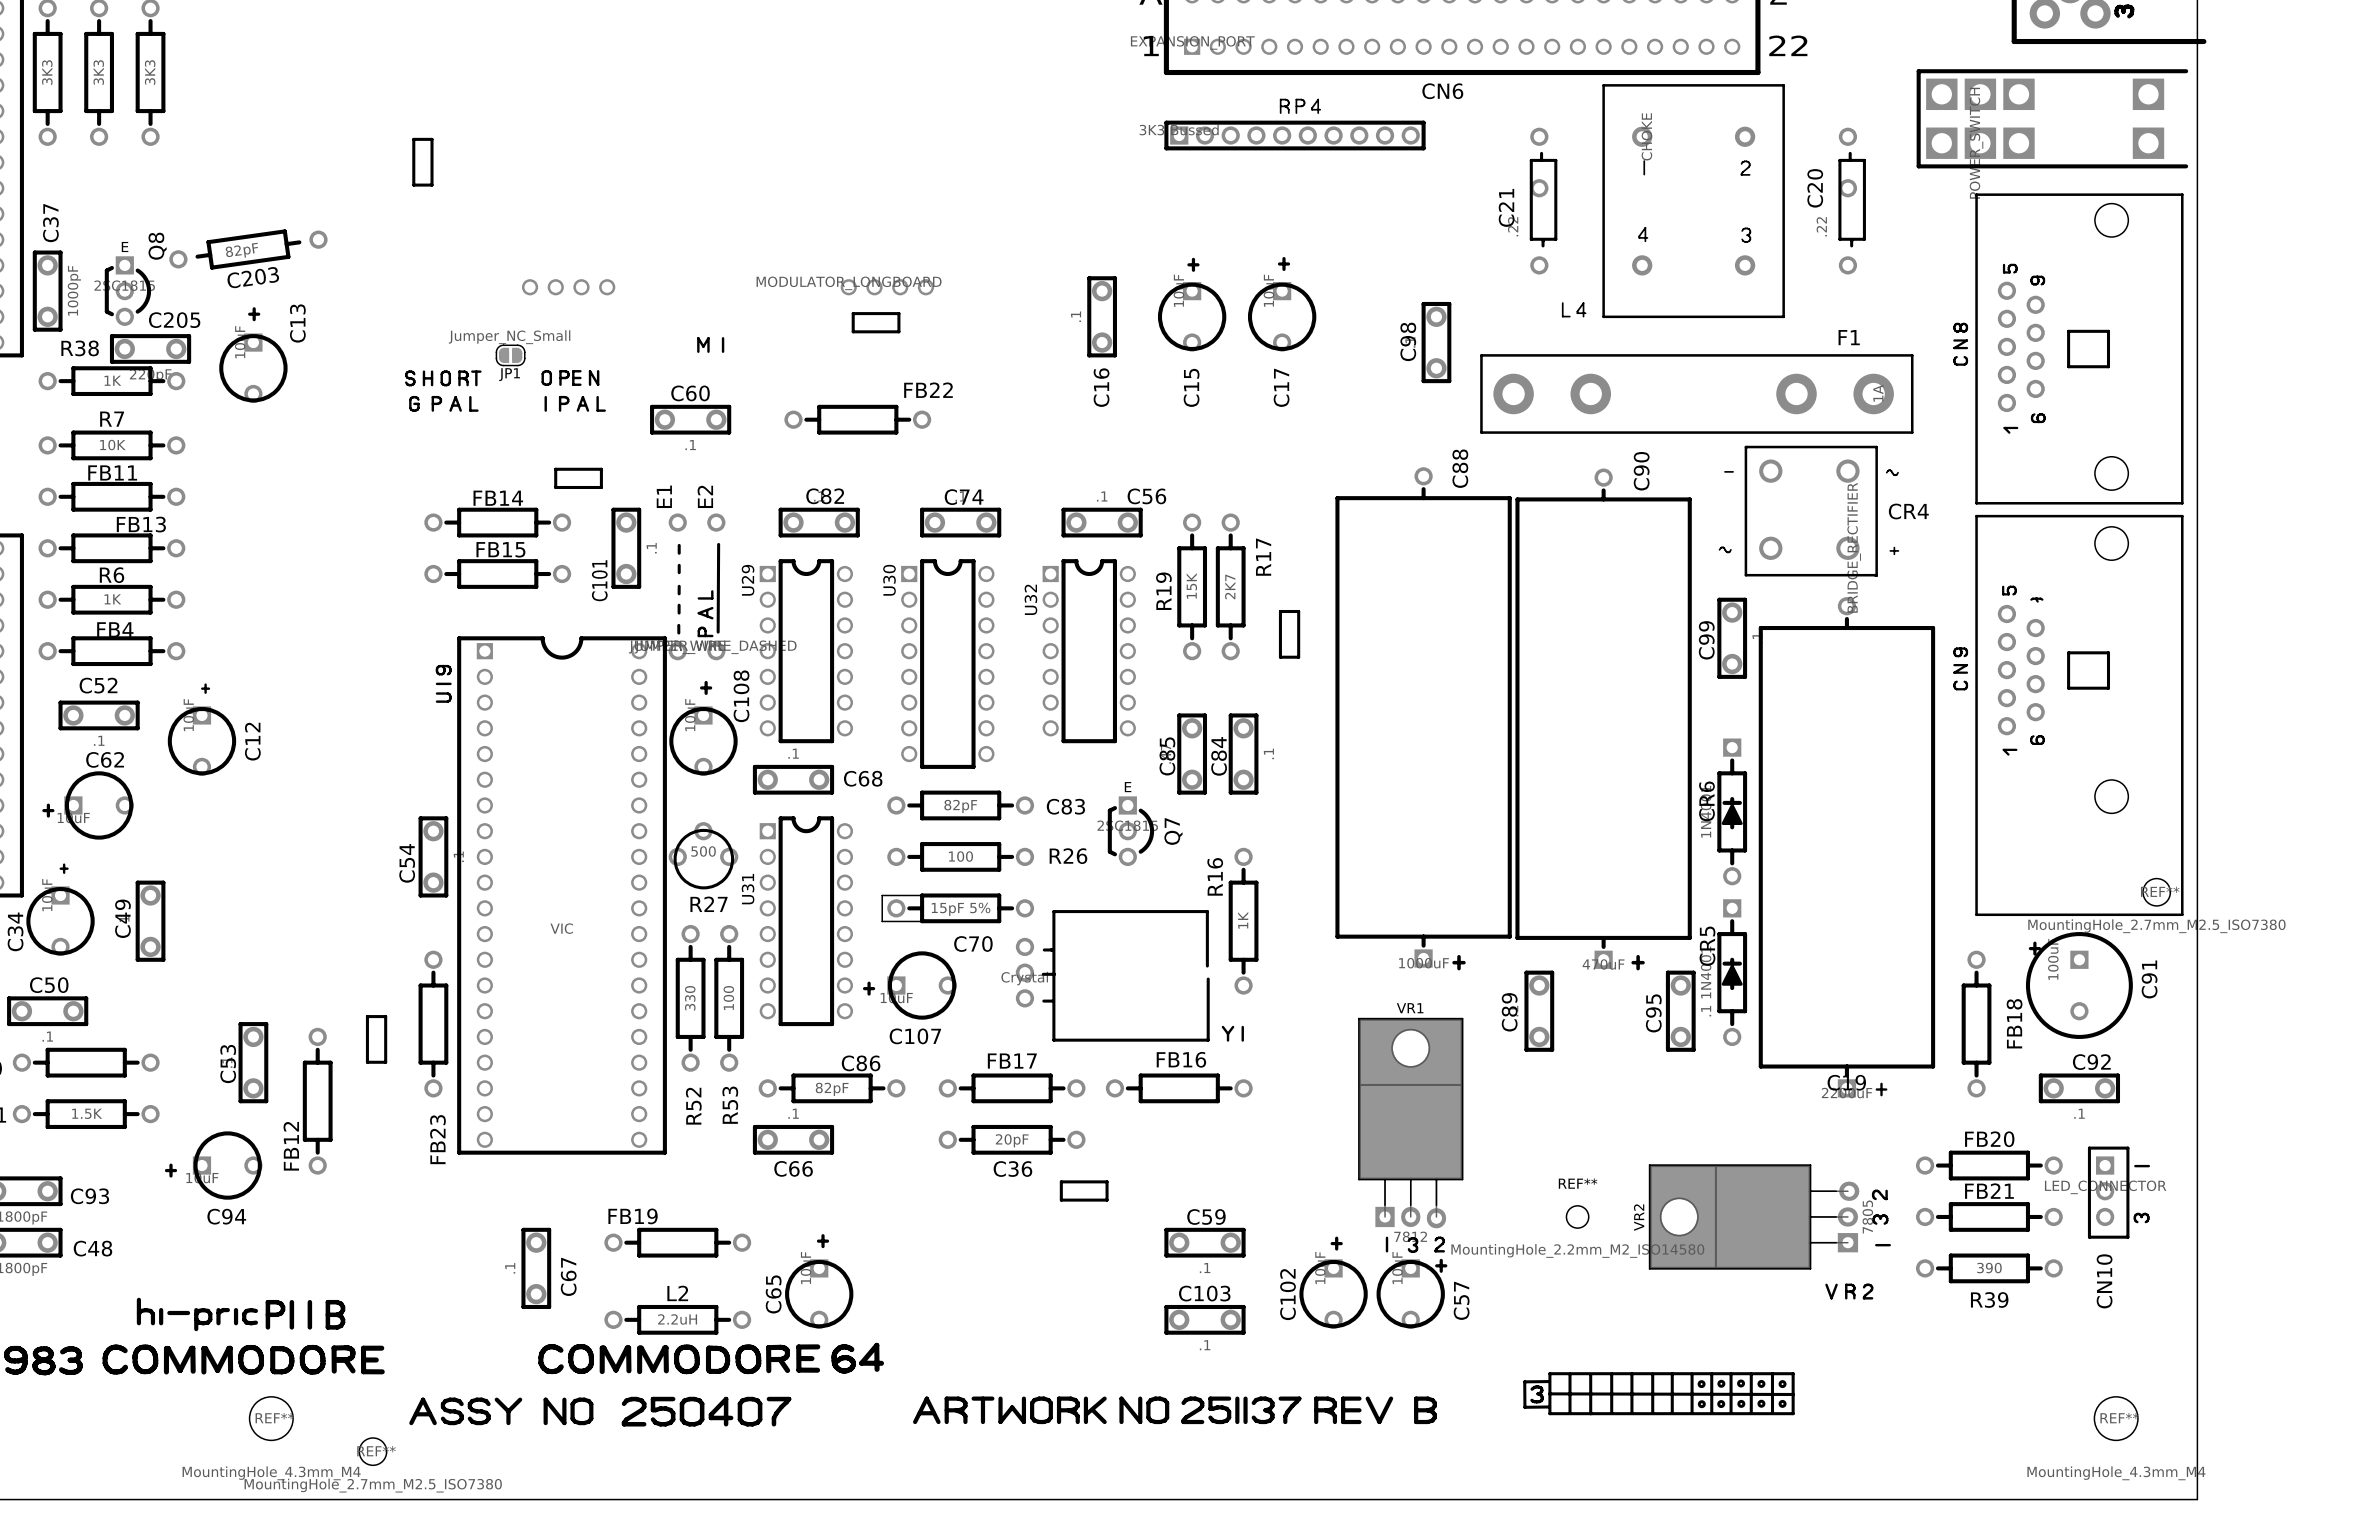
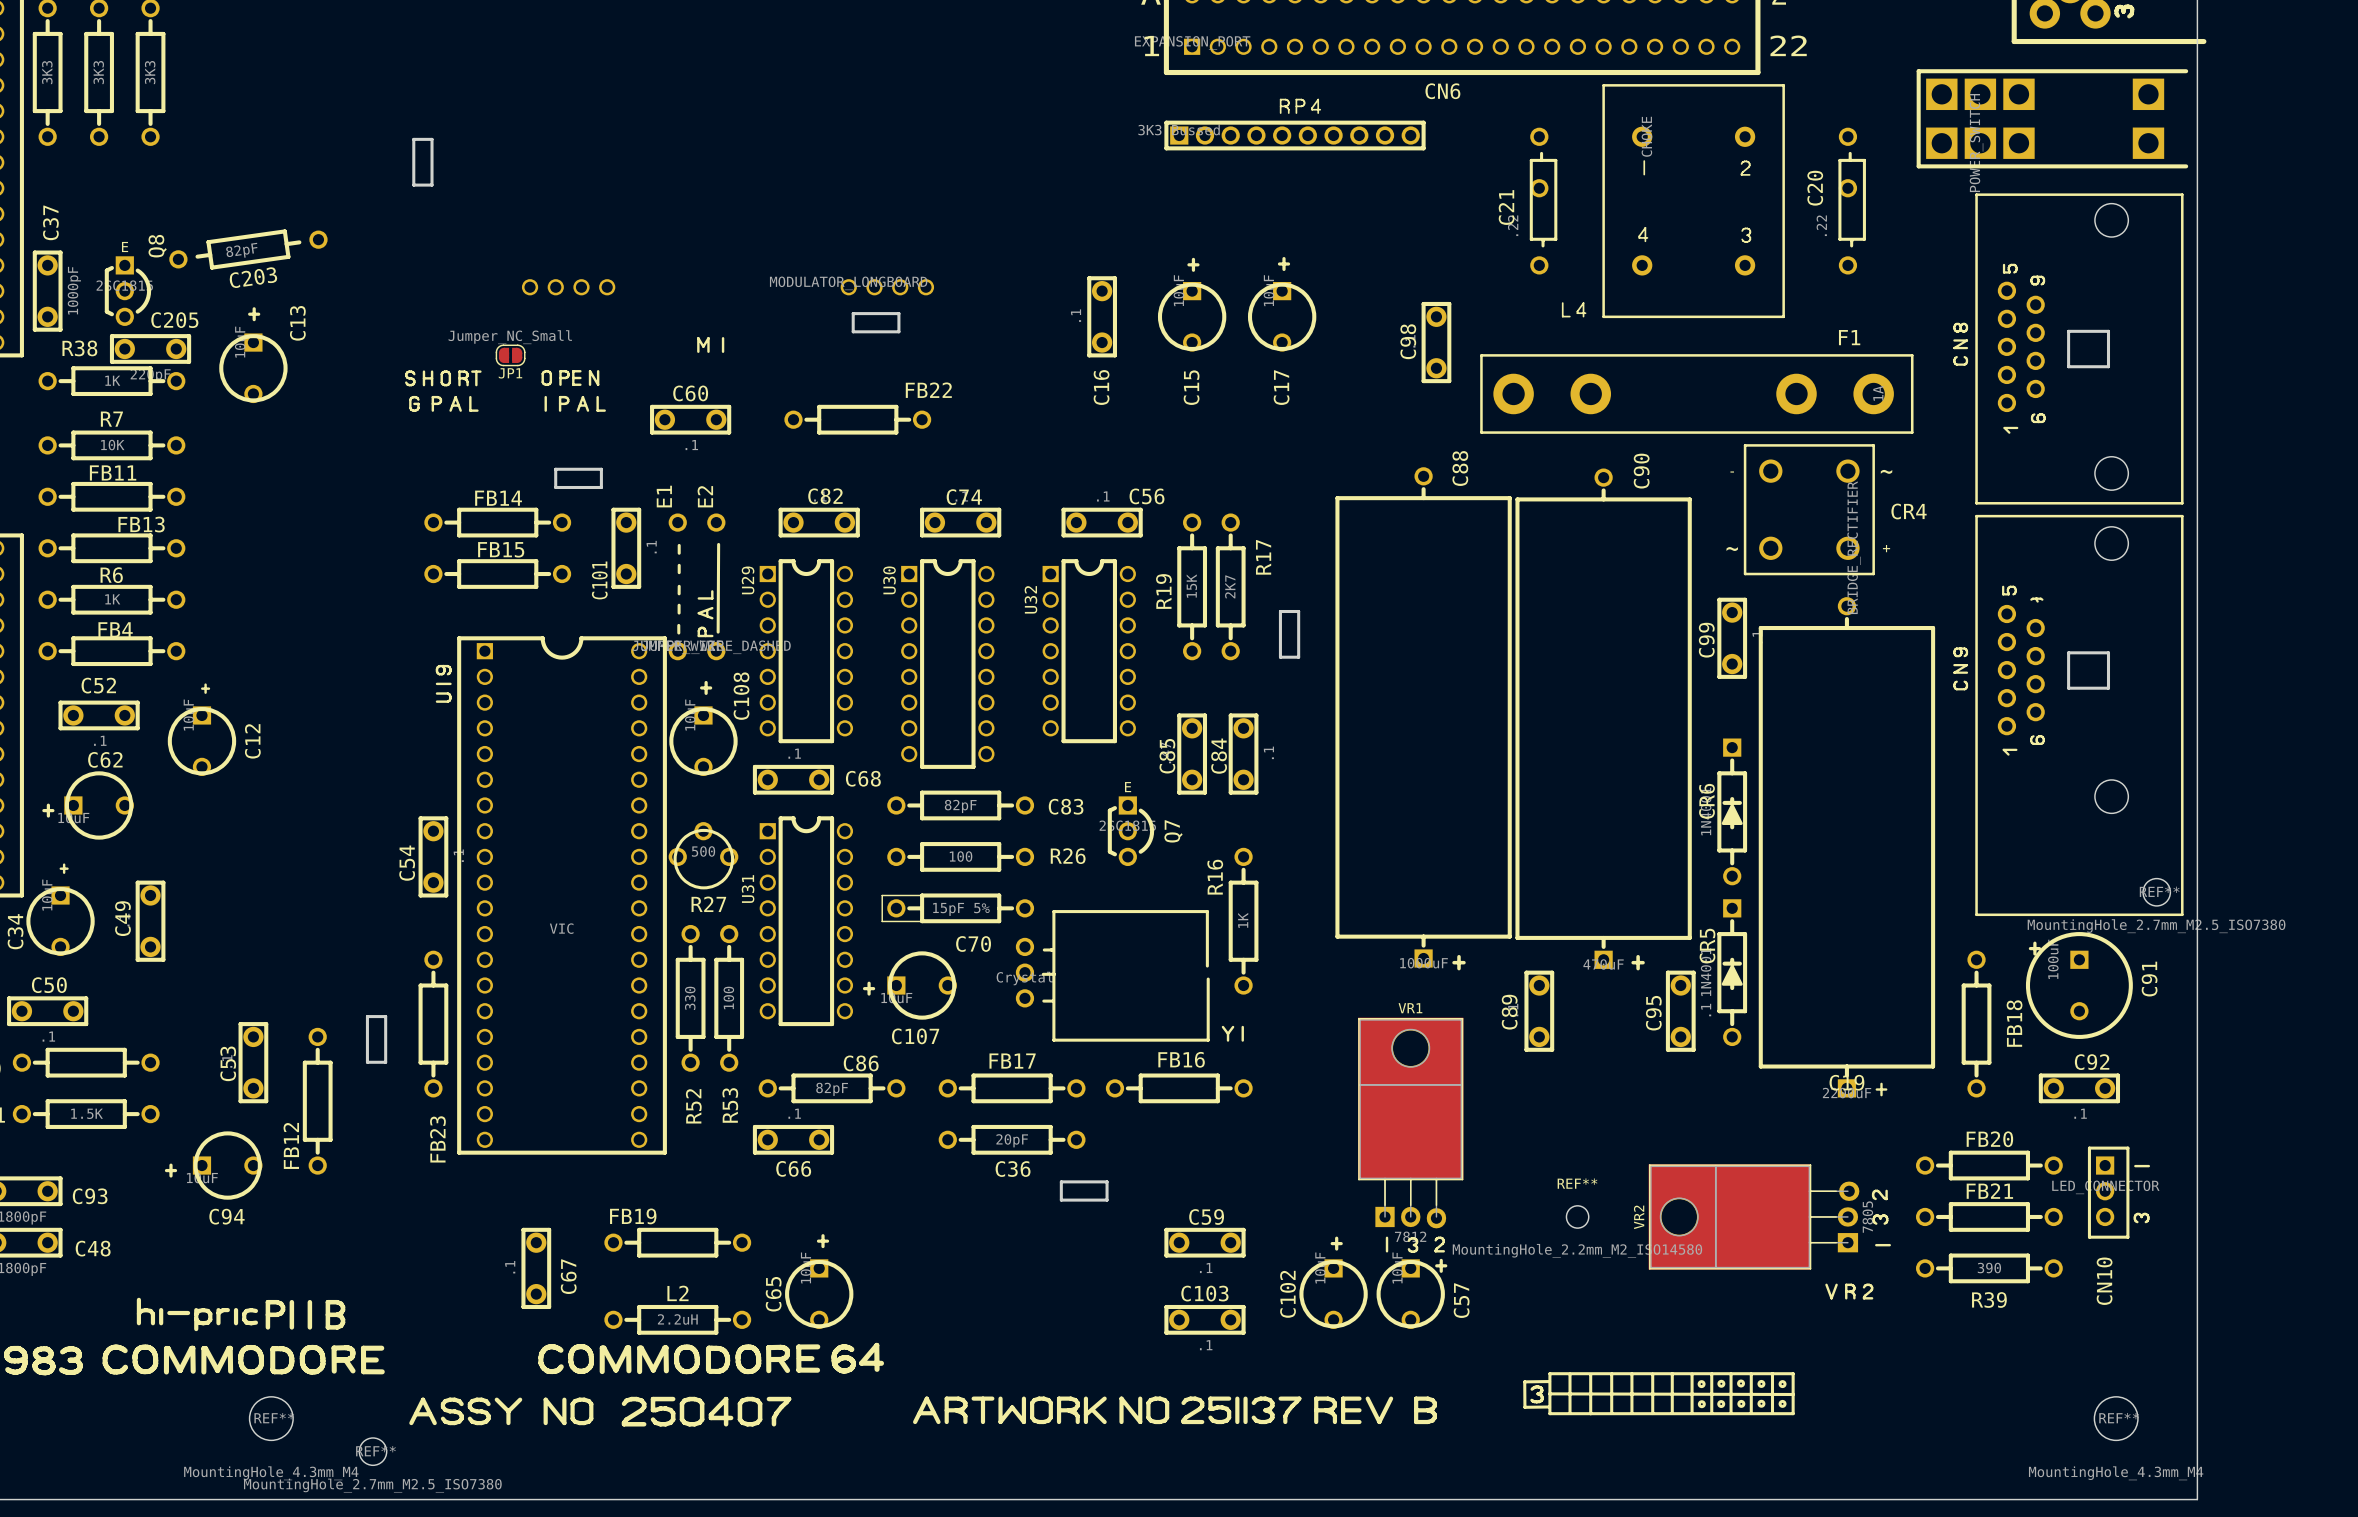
line: (1745, 447) (1876, 447) (1876, 575) (1745, 575) (1745, 447) -> none
CR4 footprint: [1759, 459, 1860, 560] -> [1743, 444, 1875, 576]
line: (1724, 471) (1733, 471) -> none
line: (1886, 472) (1890, 470) (1894, 475) (1898, 472) -> none
line: (1894, 547) (1894, 554) -> none
line: (1719, 549) (1723, 547) (1727, 552) (1730, 549) -> none
line: (1890, 550) (1898, 550) -> none

